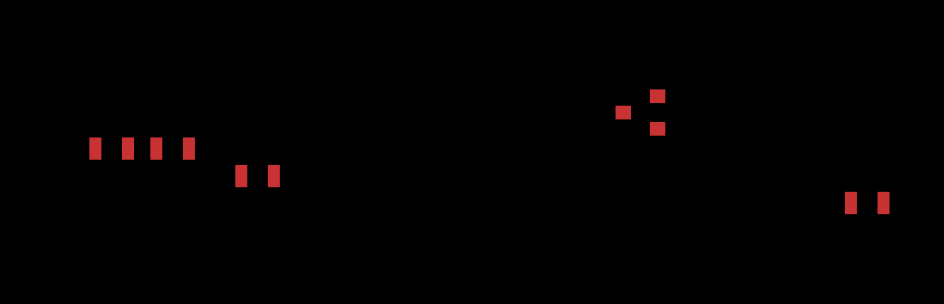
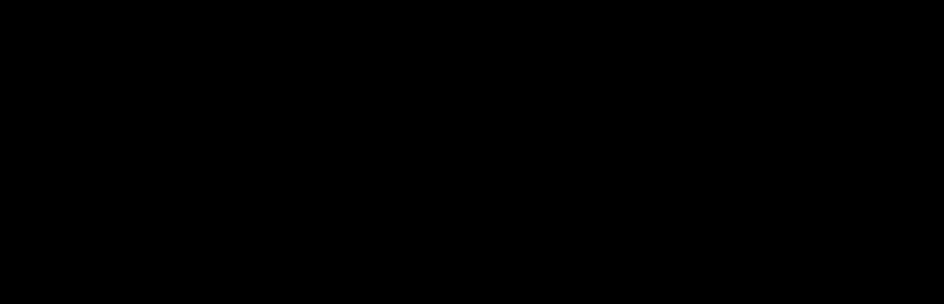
part: (640, 112) -> none
part: (111, 148) -> none
part: (172, 148) -> none
part: (257, 176) -> none
part: (867, 203) -> none

